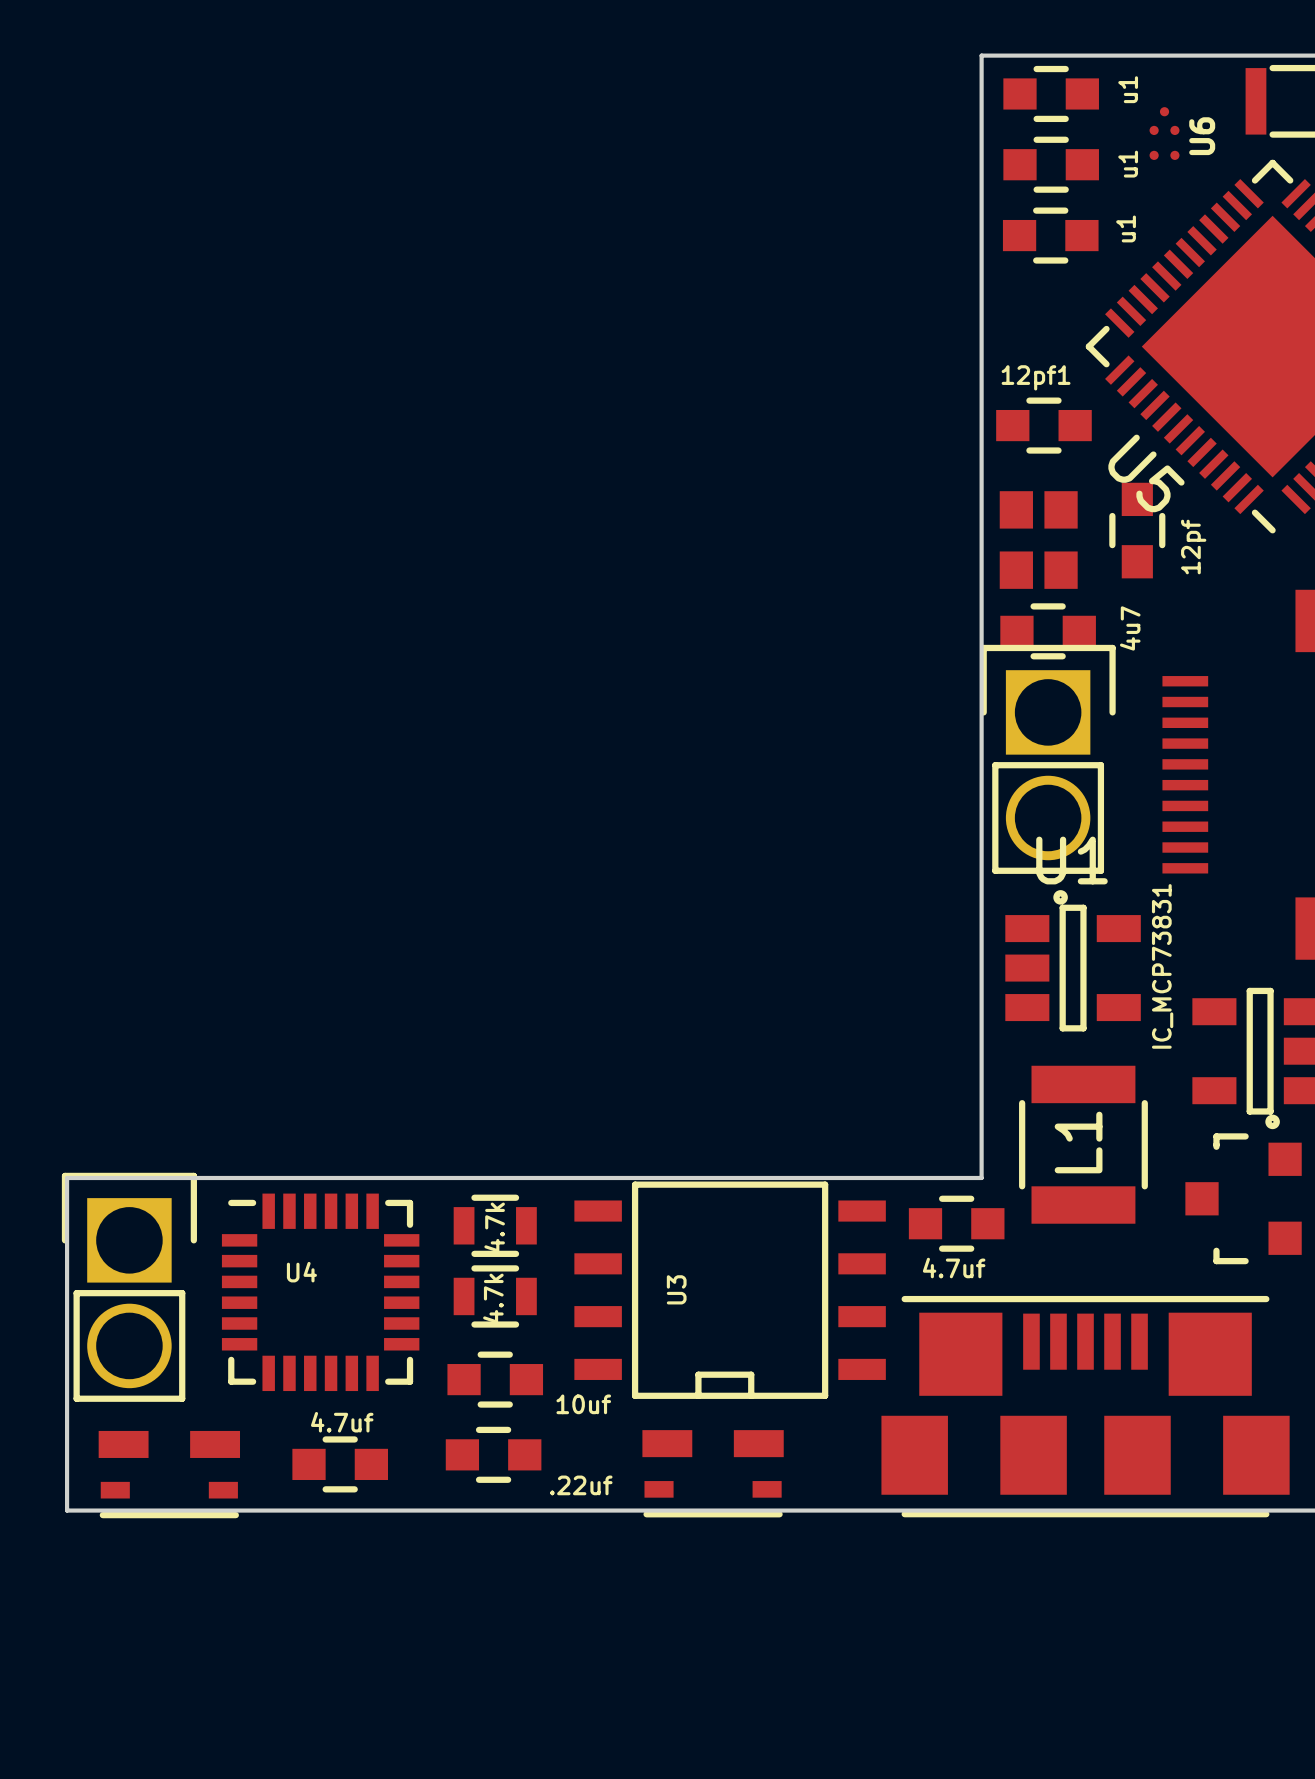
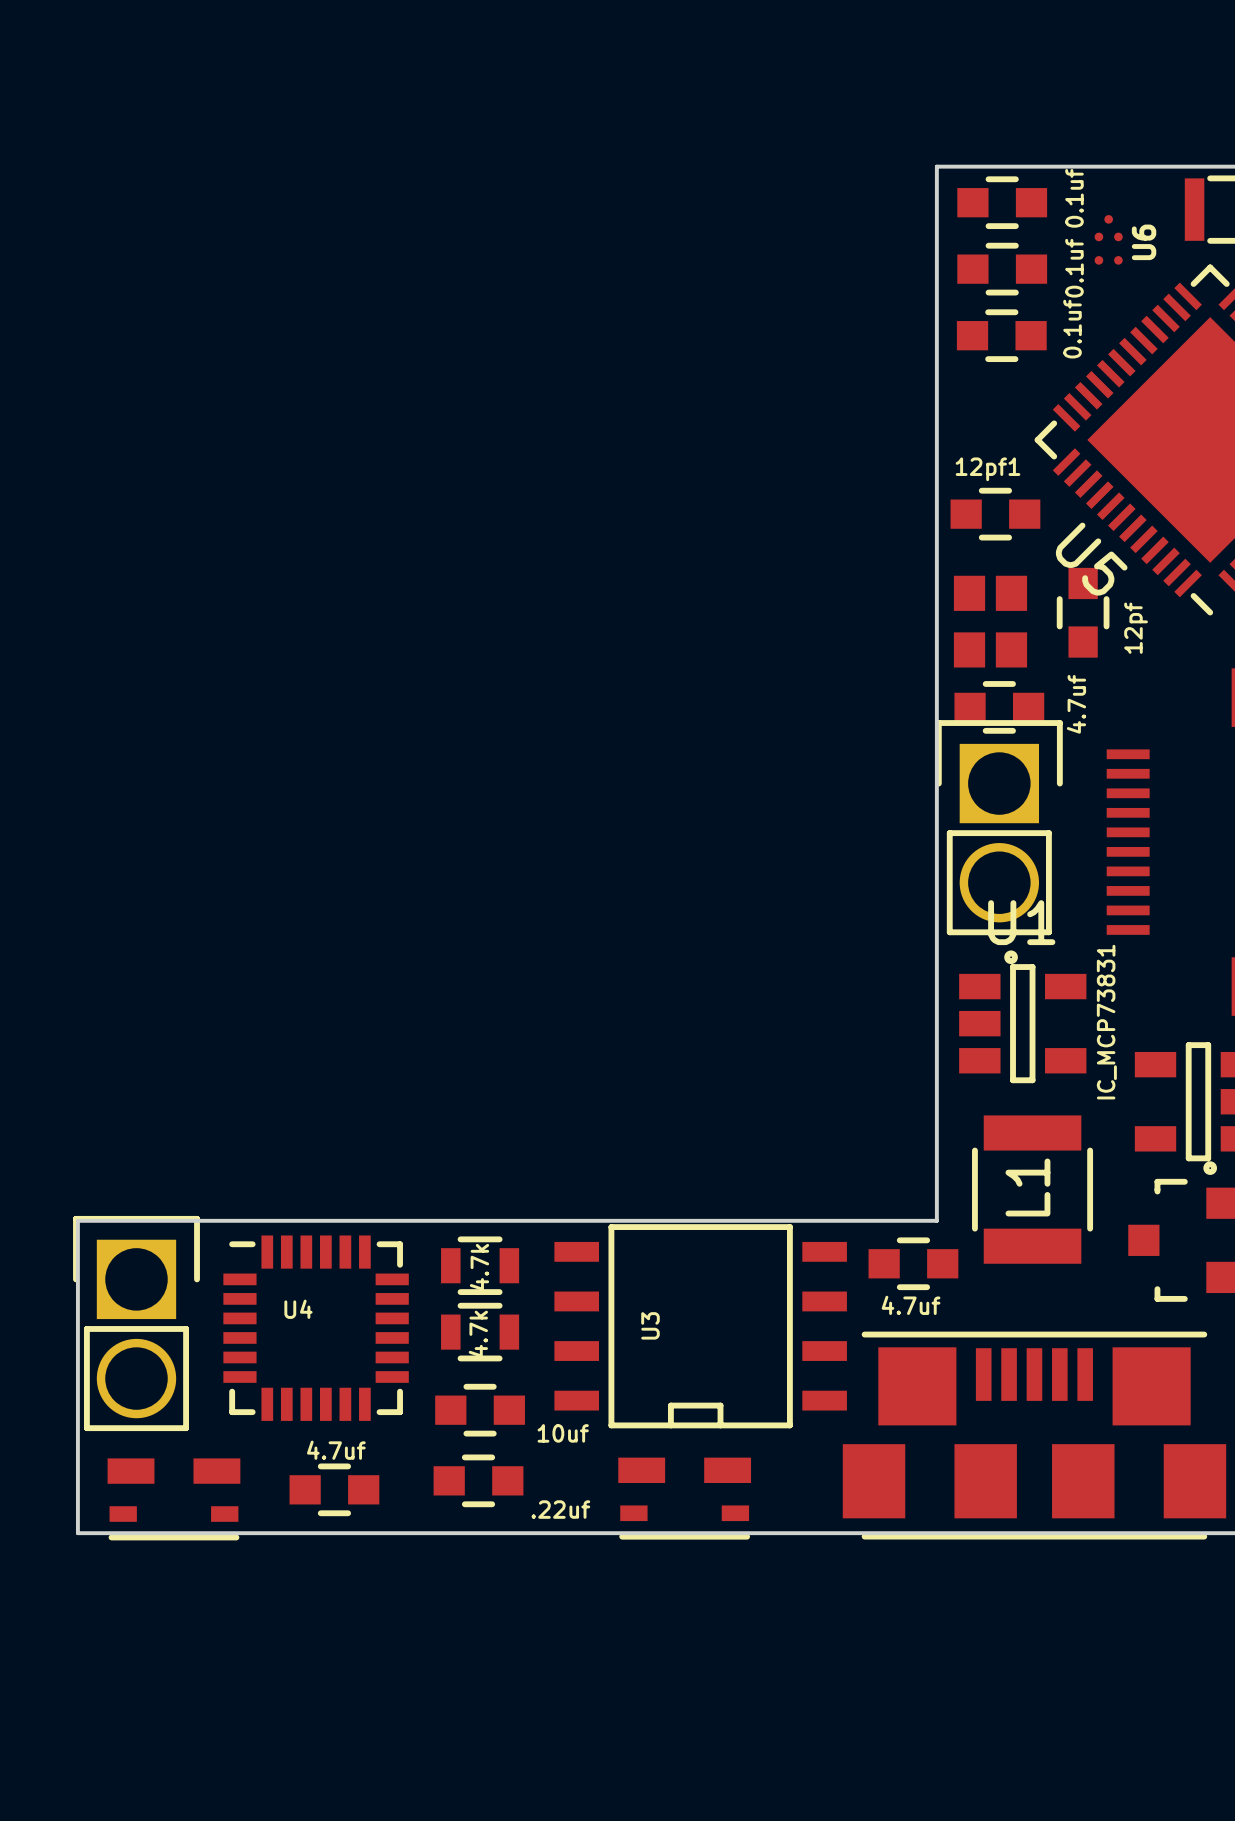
part value: u1 (1128, 89) -> 0.1uf (1074, 198)
part value: u1 (1128, 164) -> 0.1uf (1074, 268)
part value: u1 (1126, 228) -> 0.1uf (1072, 329)
part value: 4u7 (1130, 628) -> 4.7uf (1076, 704)

